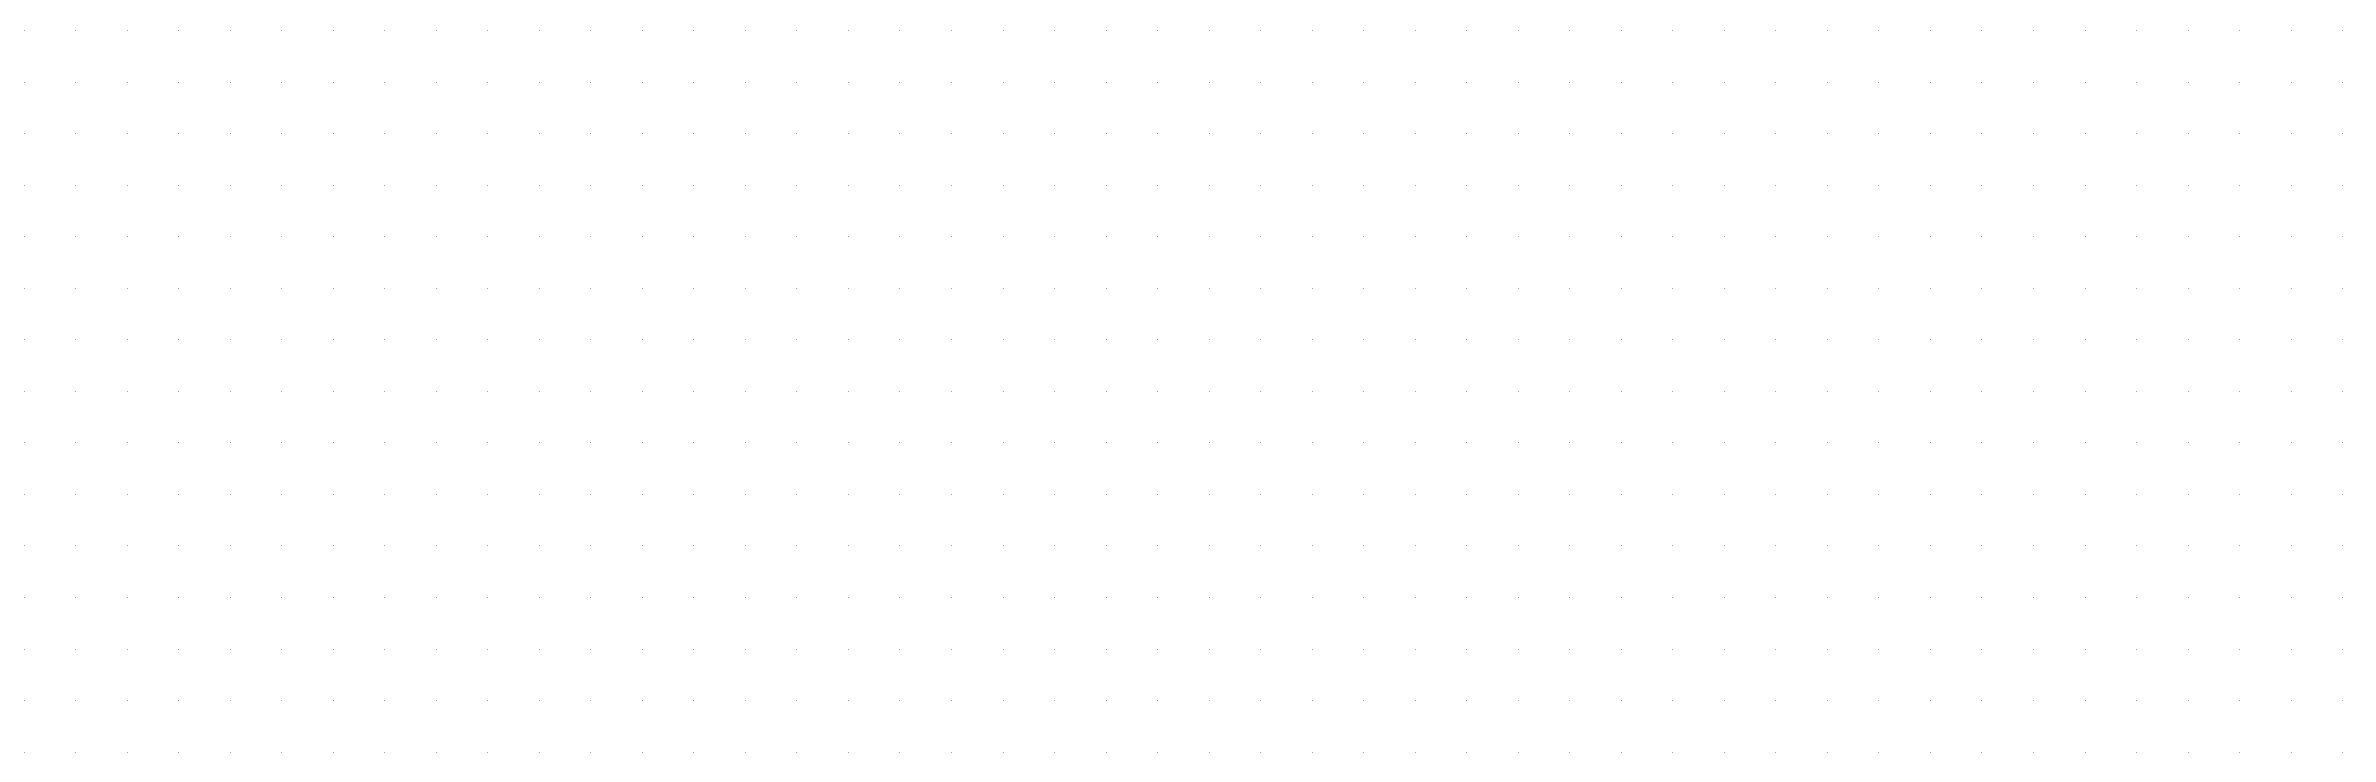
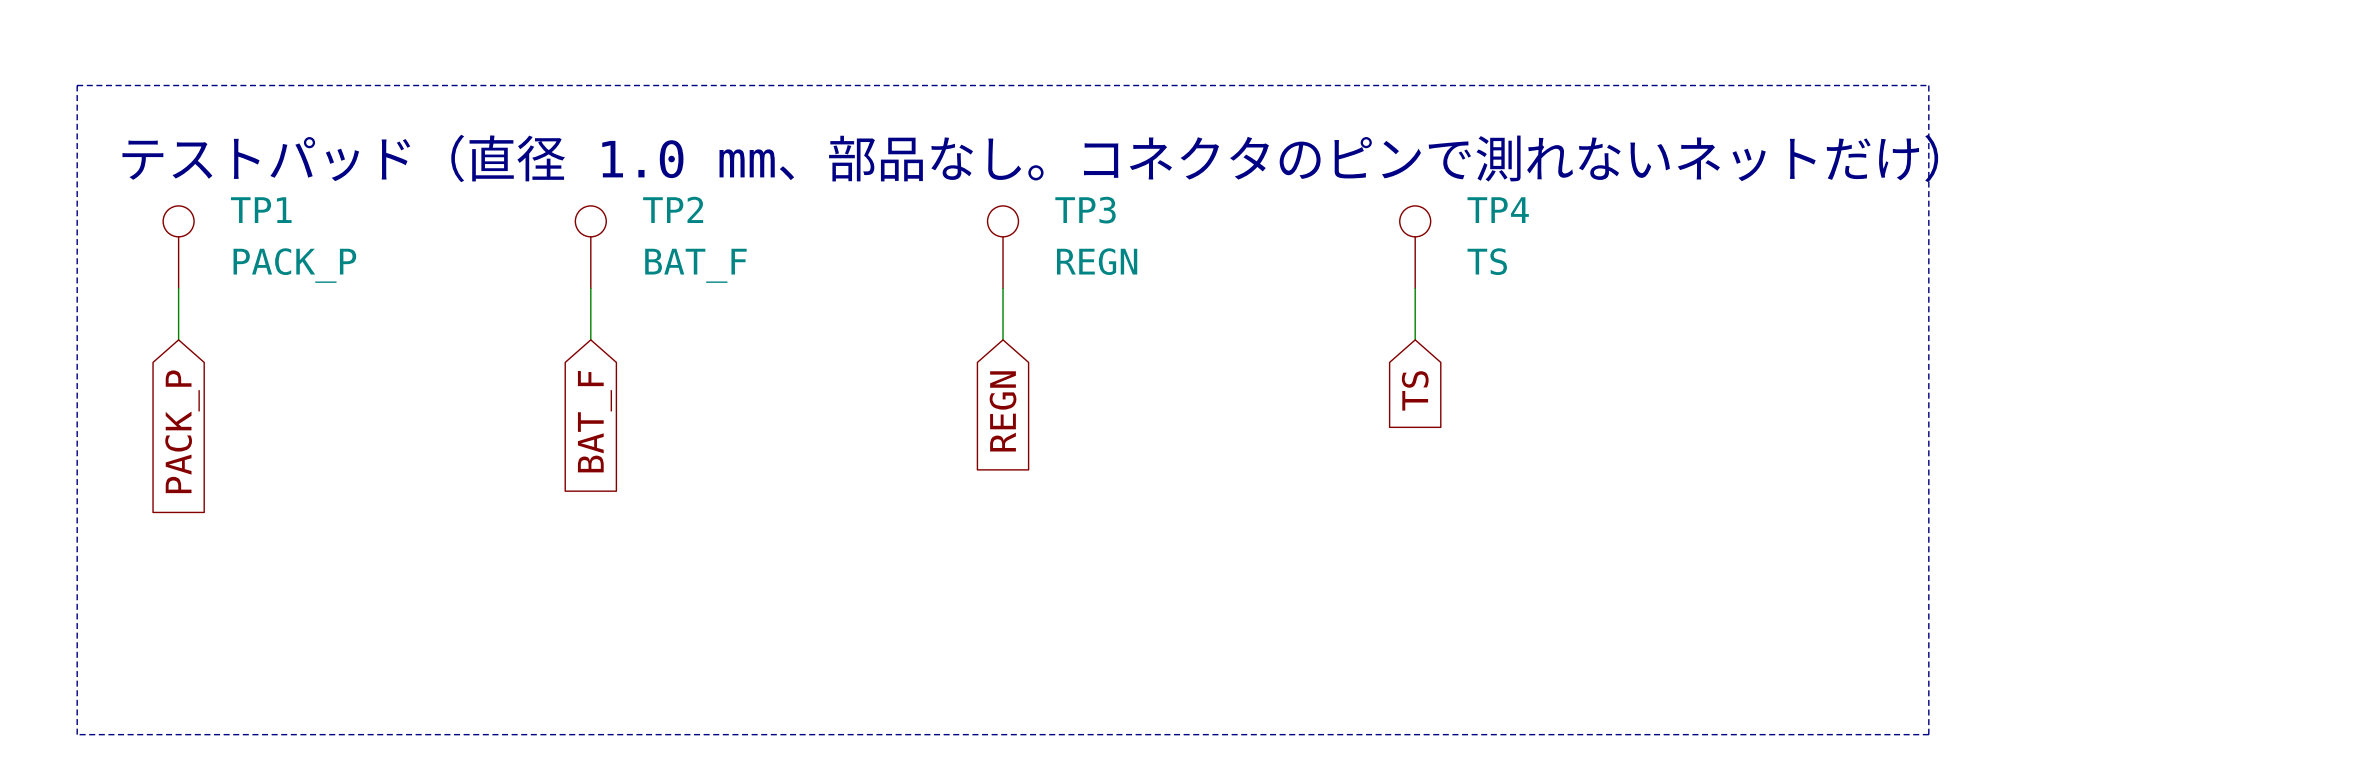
line: none -> (77, 85) (1928, 85) (1928, 734) (77, 734) (77, 85)
text: none -> テストパッド（直径 1.0 mm、部品なし。コネクタのピンで測れないネットだけ） (1030, 158)
TP1: none -> PACK_P (178, 247)
TP2: none -> BAT_F (590, 247)
TP3: none -> REGN (1003, 247)
TP4: none -> TS (1415, 247)
wire: none -> (178, 288) (178, 339)
wire: none -> (590, 288) (590, 339)
wire: none -> (1003, 288) (1003, 339)
wire: none -> (1415, 288) (1415, 339)
global label: none -> TS (1415, 390)
global label: none -> REGN (1003, 411)
global label: none -> BAT_F (594, 421)
global label: none -> PACK_P (182, 431)

